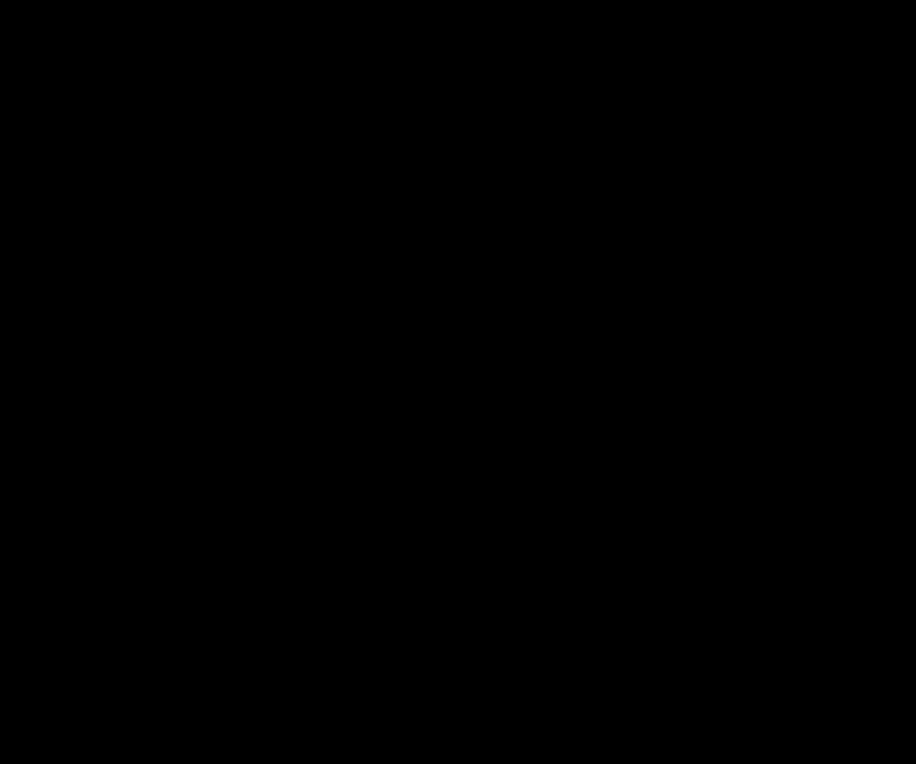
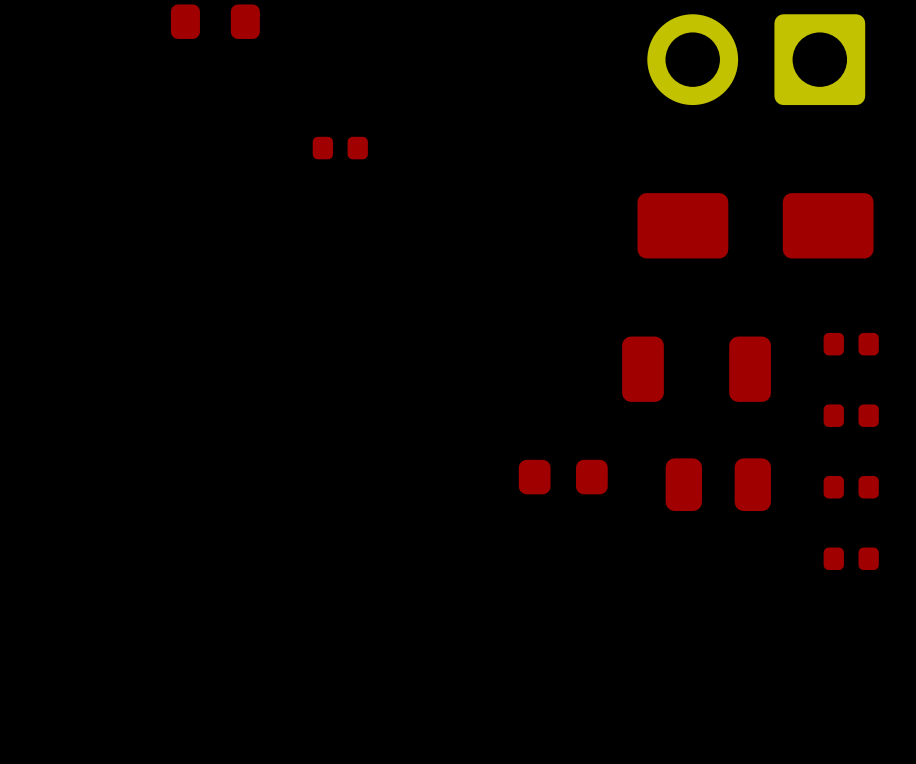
part: none -> (215, 21)
part: none -> (756, 59)
part: none -> (340, 148)
part: none -> (755, 225)
part: none -> (851, 344)
part: none -> (696, 369)
part: none -> (851, 415)
part: none -> (563, 477)
part: none -> (718, 484)
part: none -> (851, 487)
part: none -> (851, 558)

